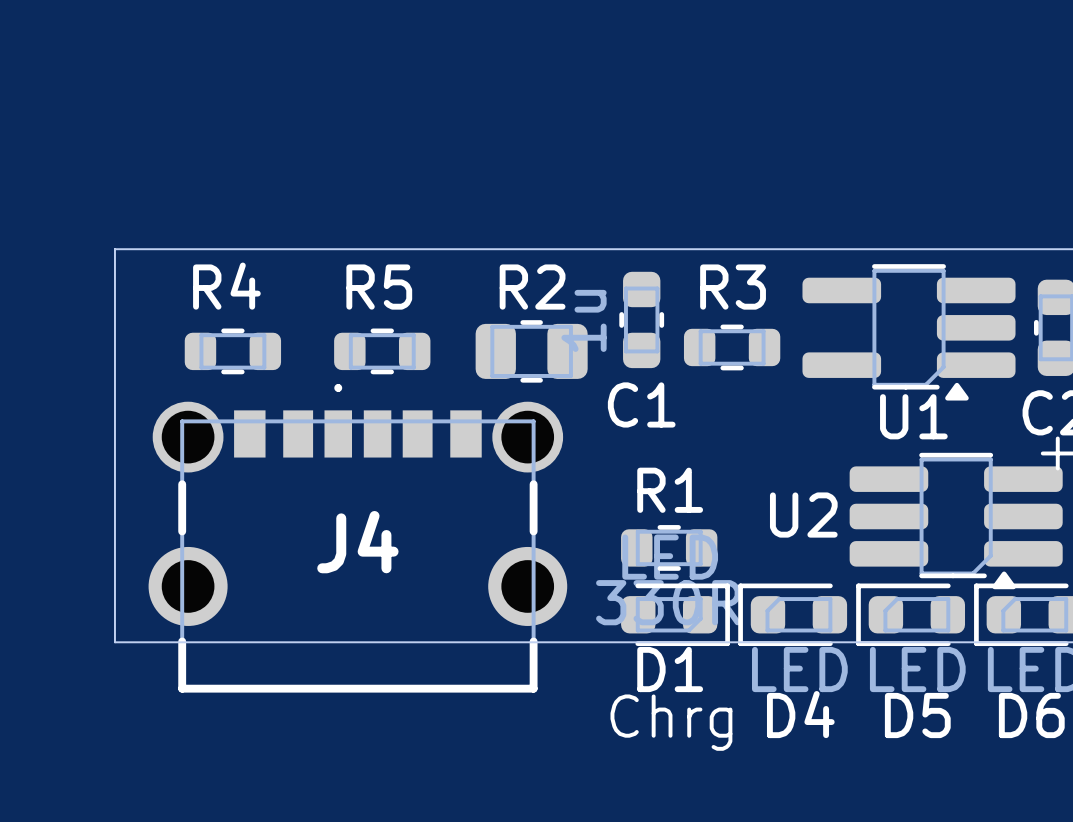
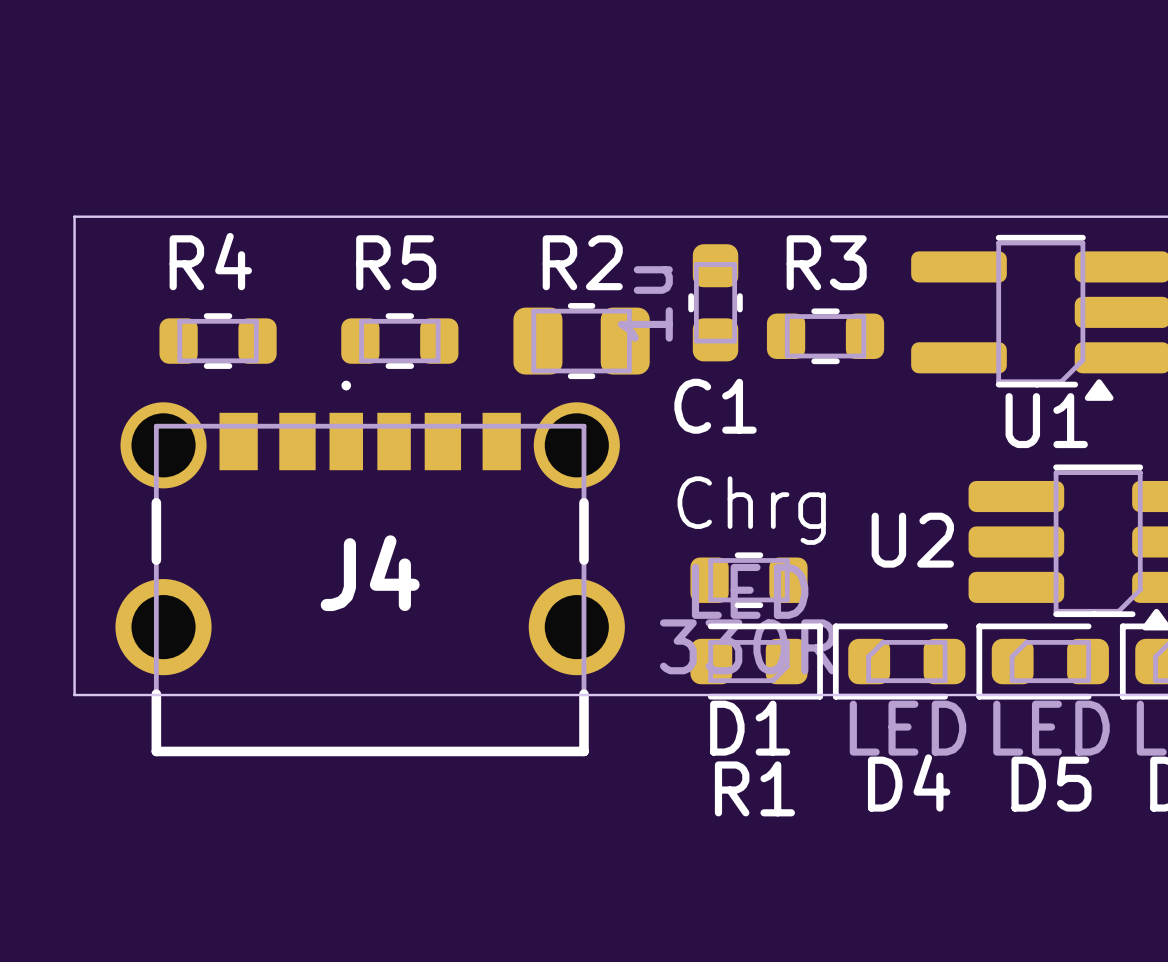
R1 name position: R1 (670, 490) -> R1 (754, 788)
text position: Chrg (671, 722) -> Chrg (751, 510)

